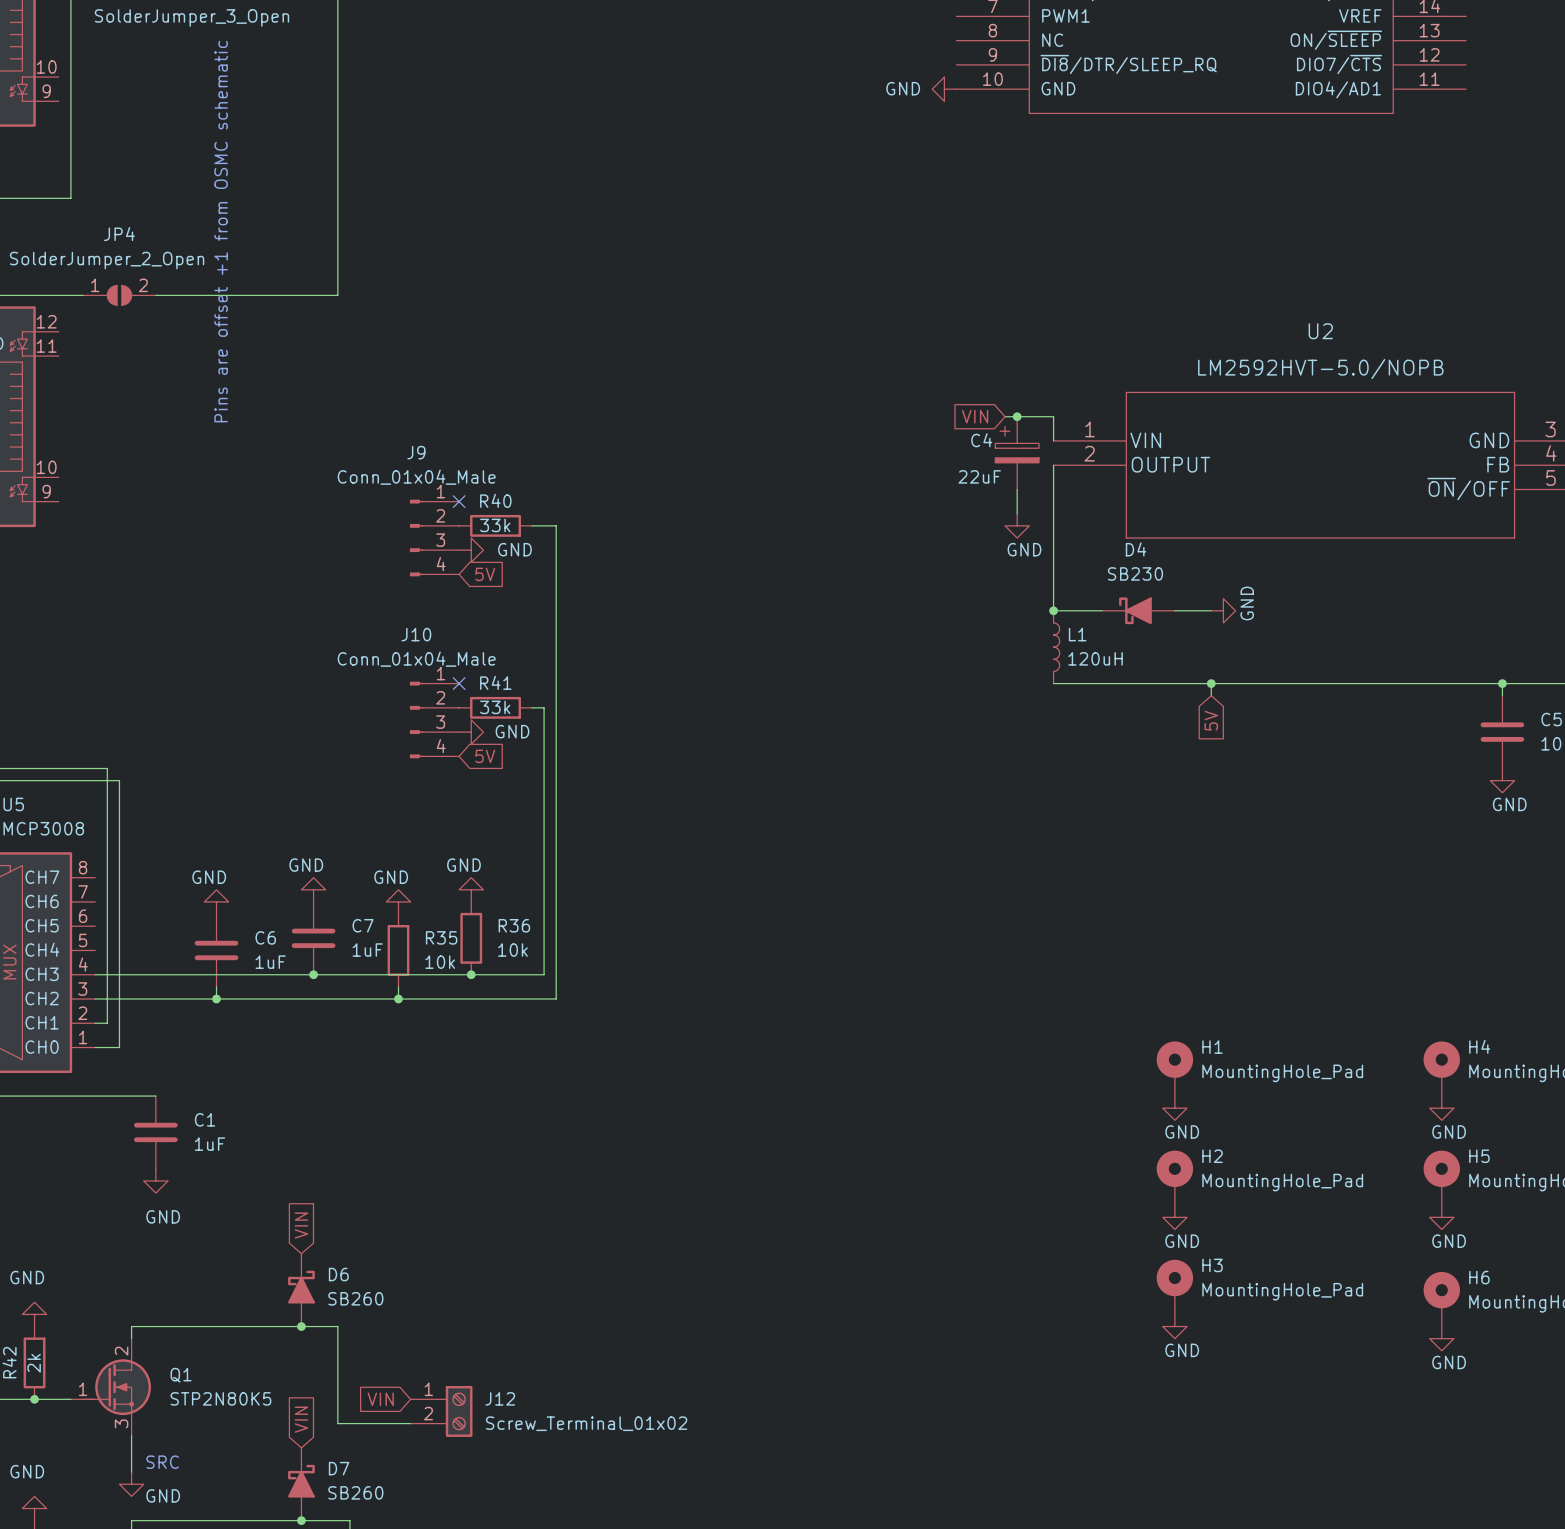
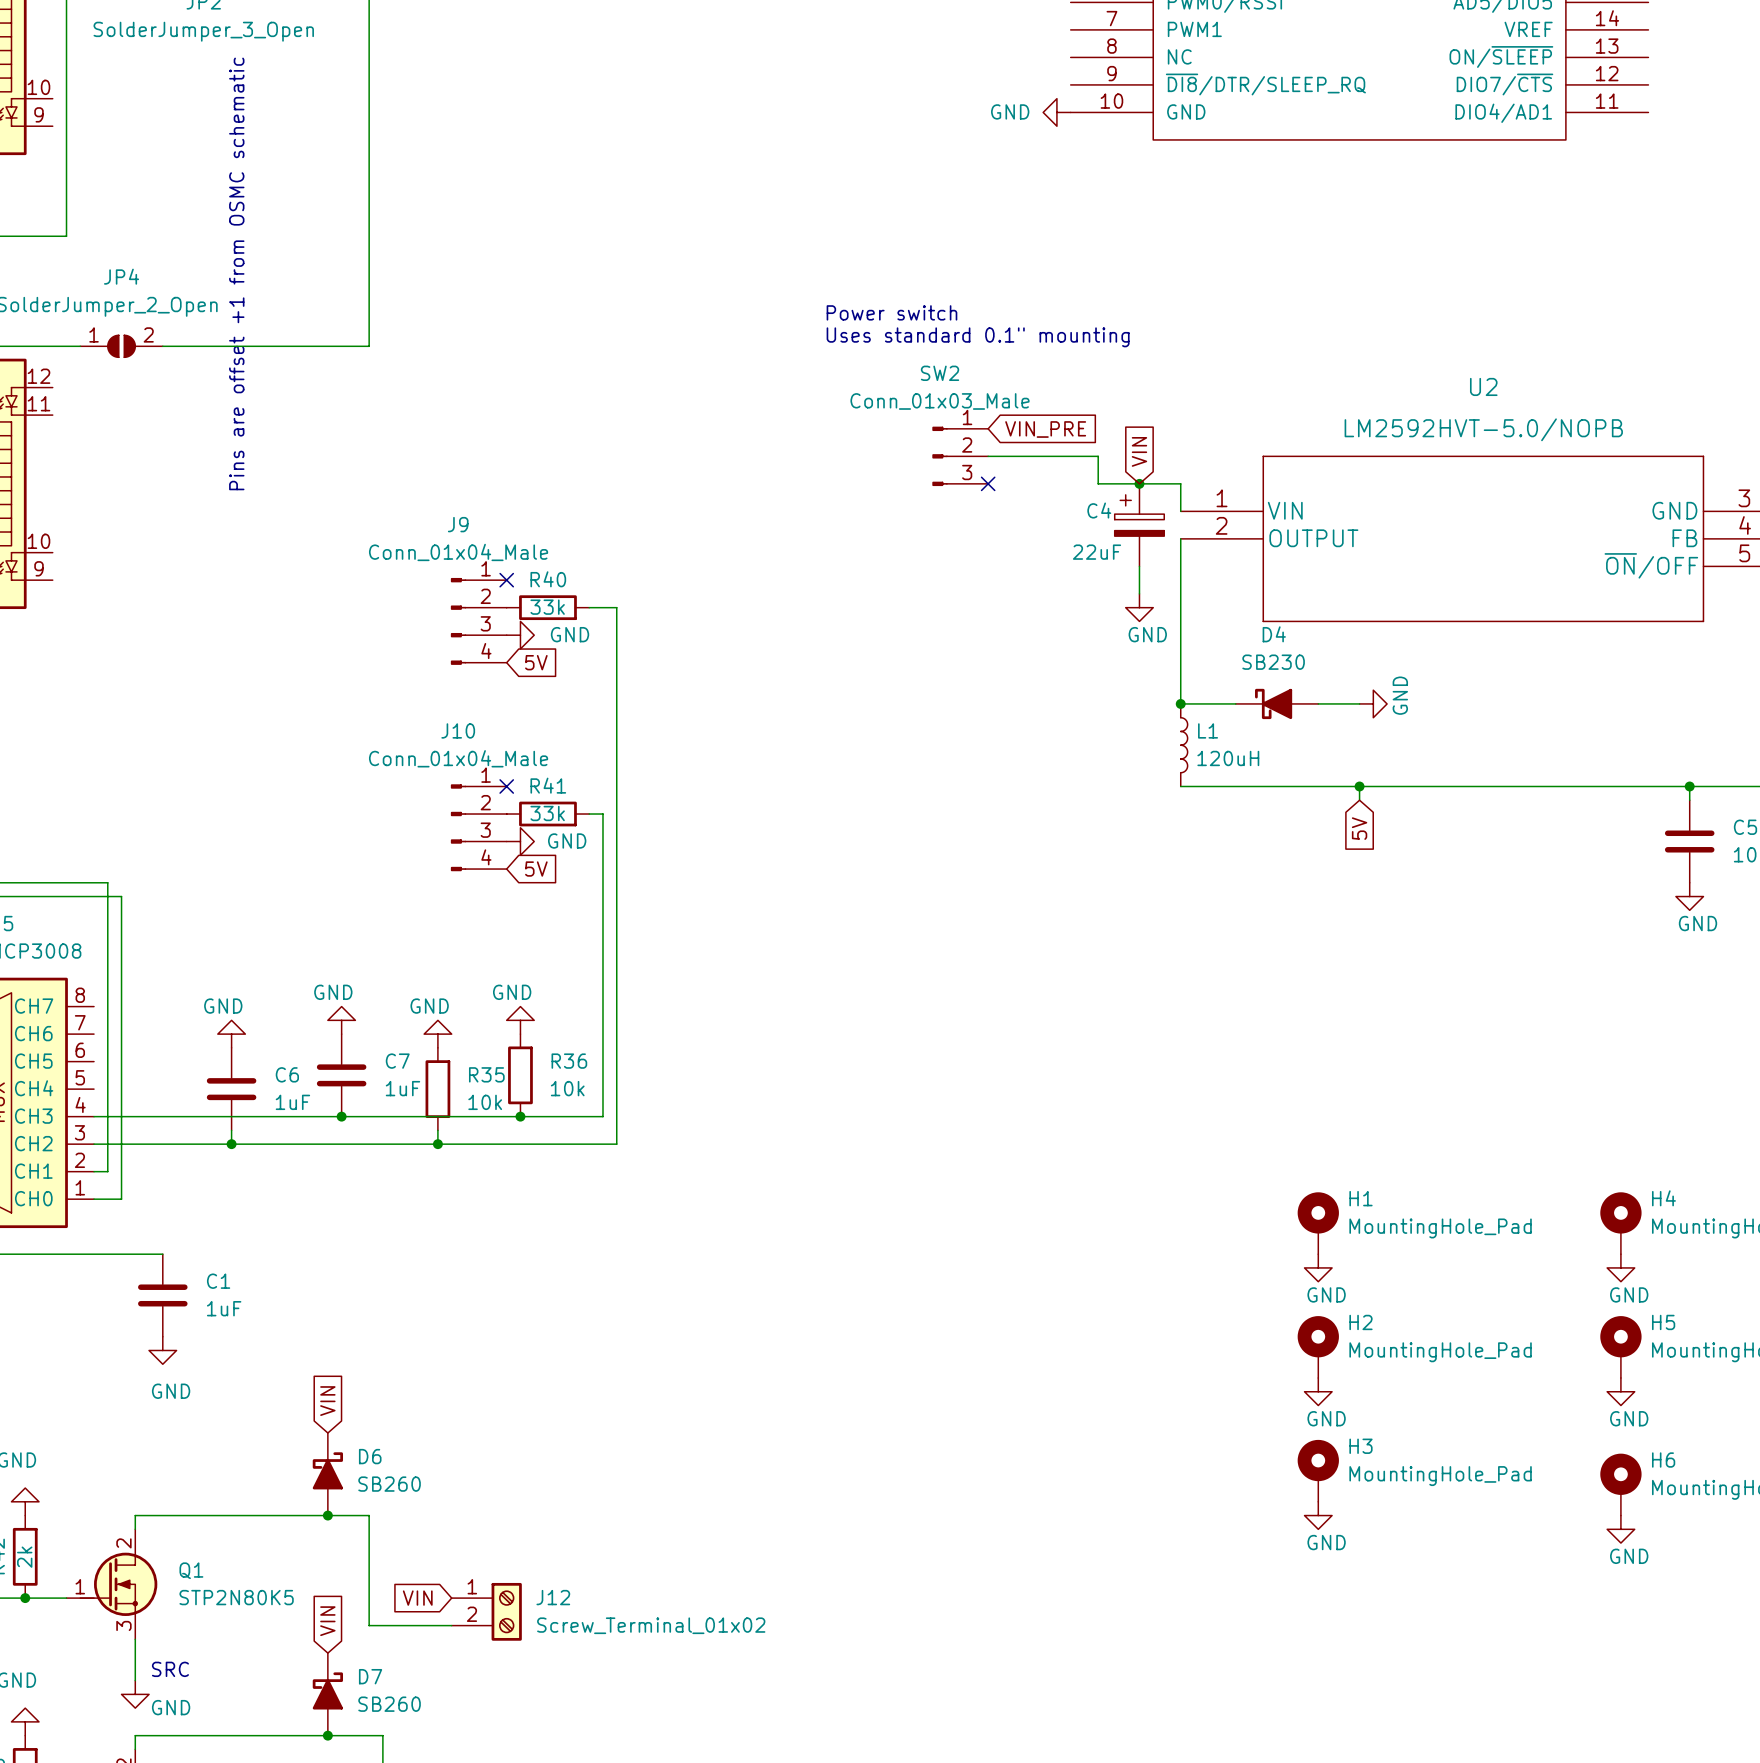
text: none -> Power switch (891, 312)
text: none -> Uses standard 0.1" mounting (978, 337)
global label: none -> VIN_PRE (1045, 429)
SW2: none -> Conn_01x03_Male (960, 456)
wire: none -> (988, 456) (1098, 456) (1098, 483) (1125, 483)
no-connect mark: none -> (988, 483)
global label rotation: 0° (975, 416) -> 90° clockwise (1139, 451)

